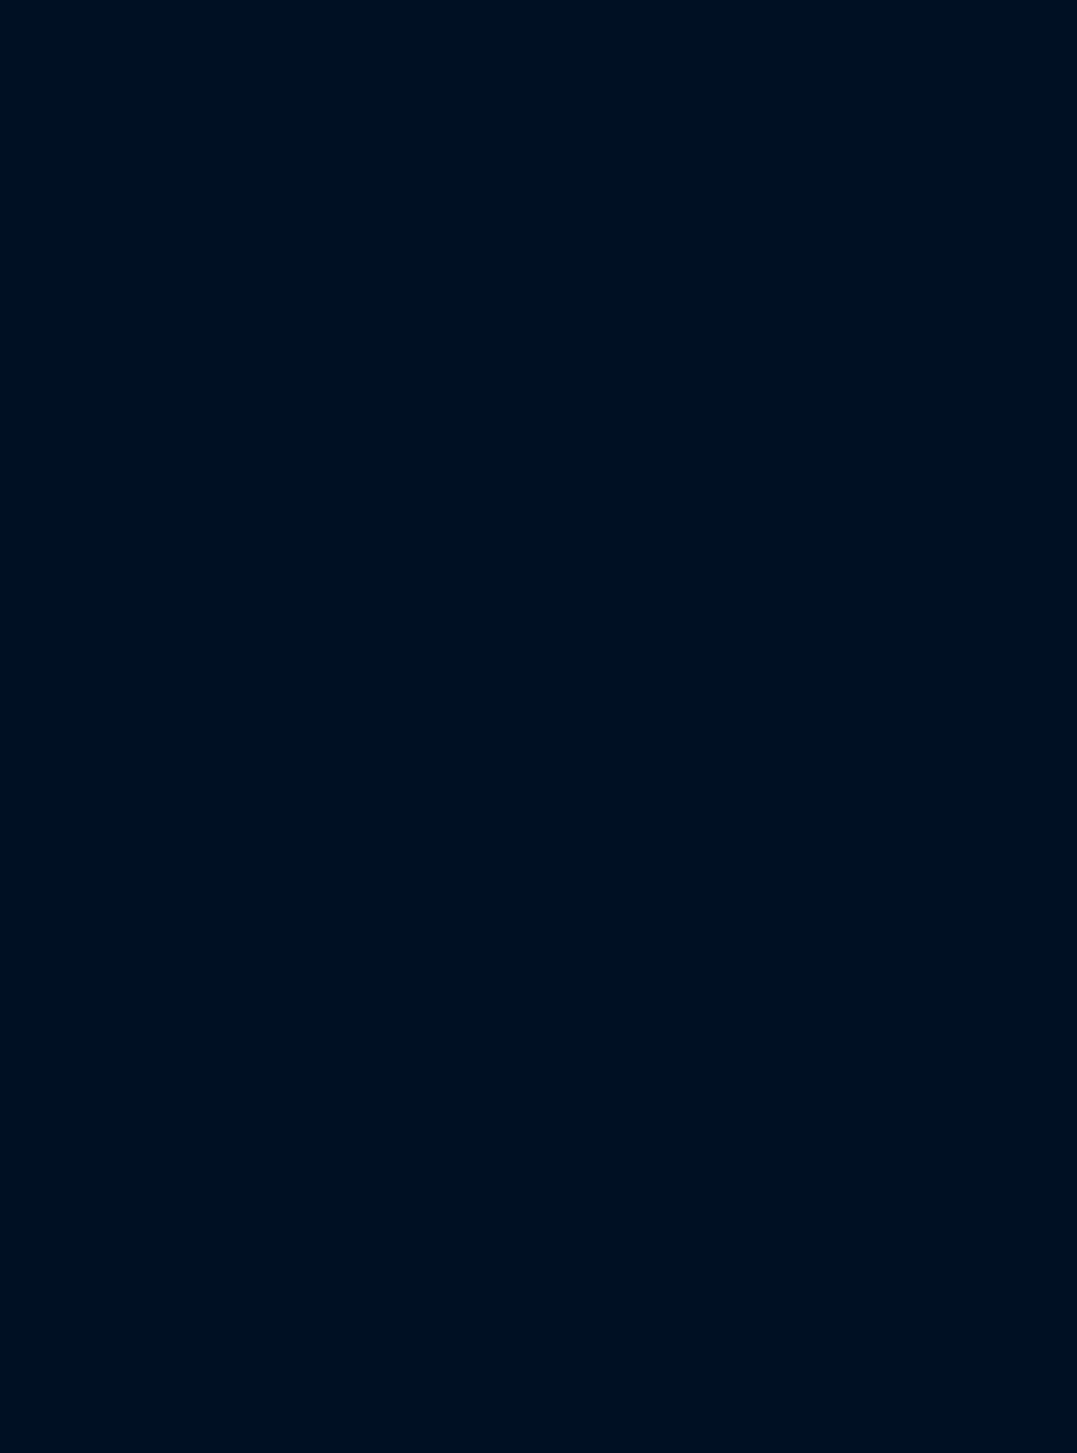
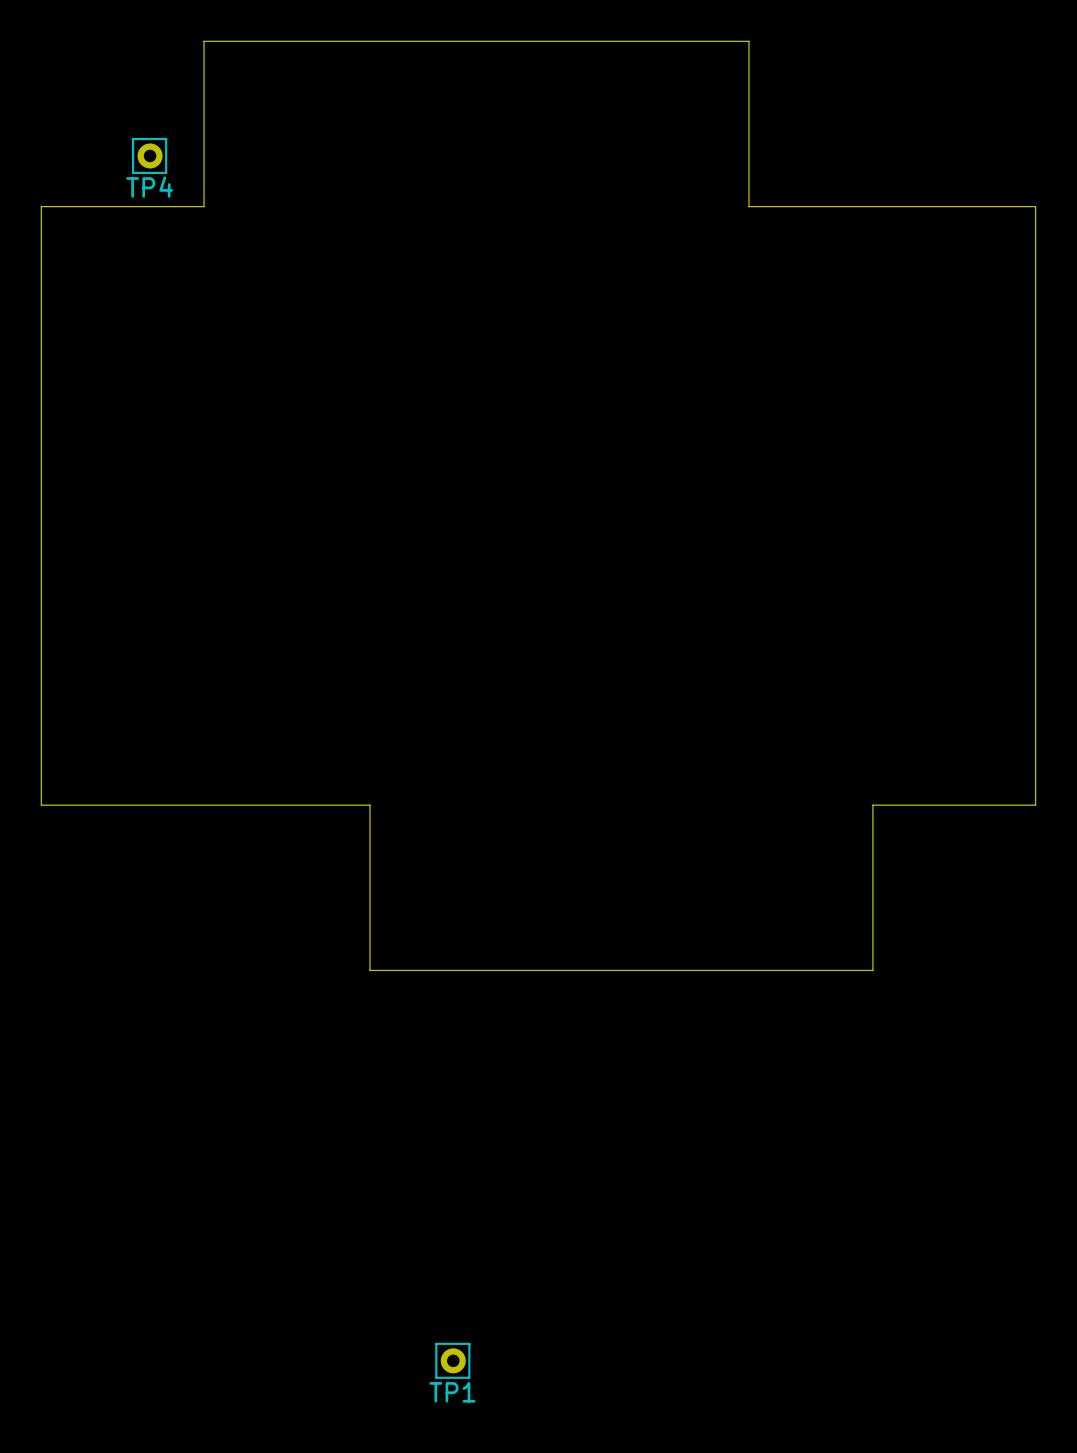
board edge: none -> (204, 41) (204, 206) (41, 206) (41, 805) (370, 805) (370, 970) (872, 970) (872, 805) (1035, 805) (1035, 206) (748, 206) (748, 41) (204, 41)
TP4: none -> (149, 155)
TP1: none -> (452, 1360)

